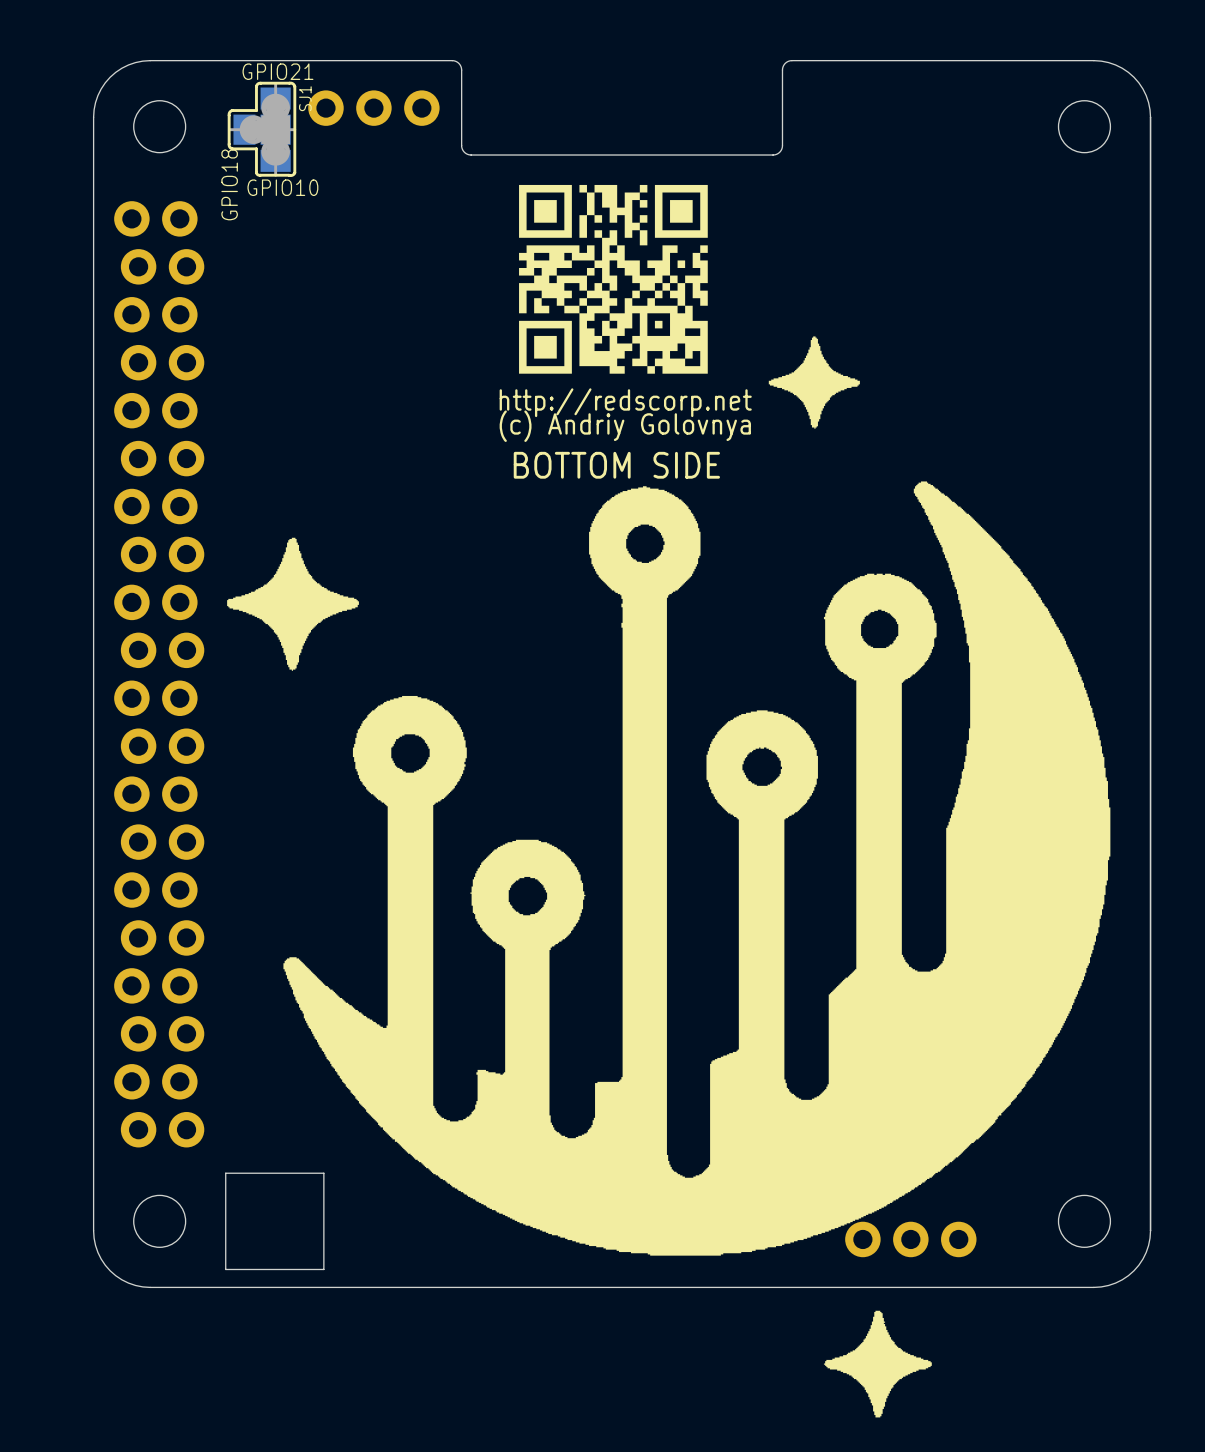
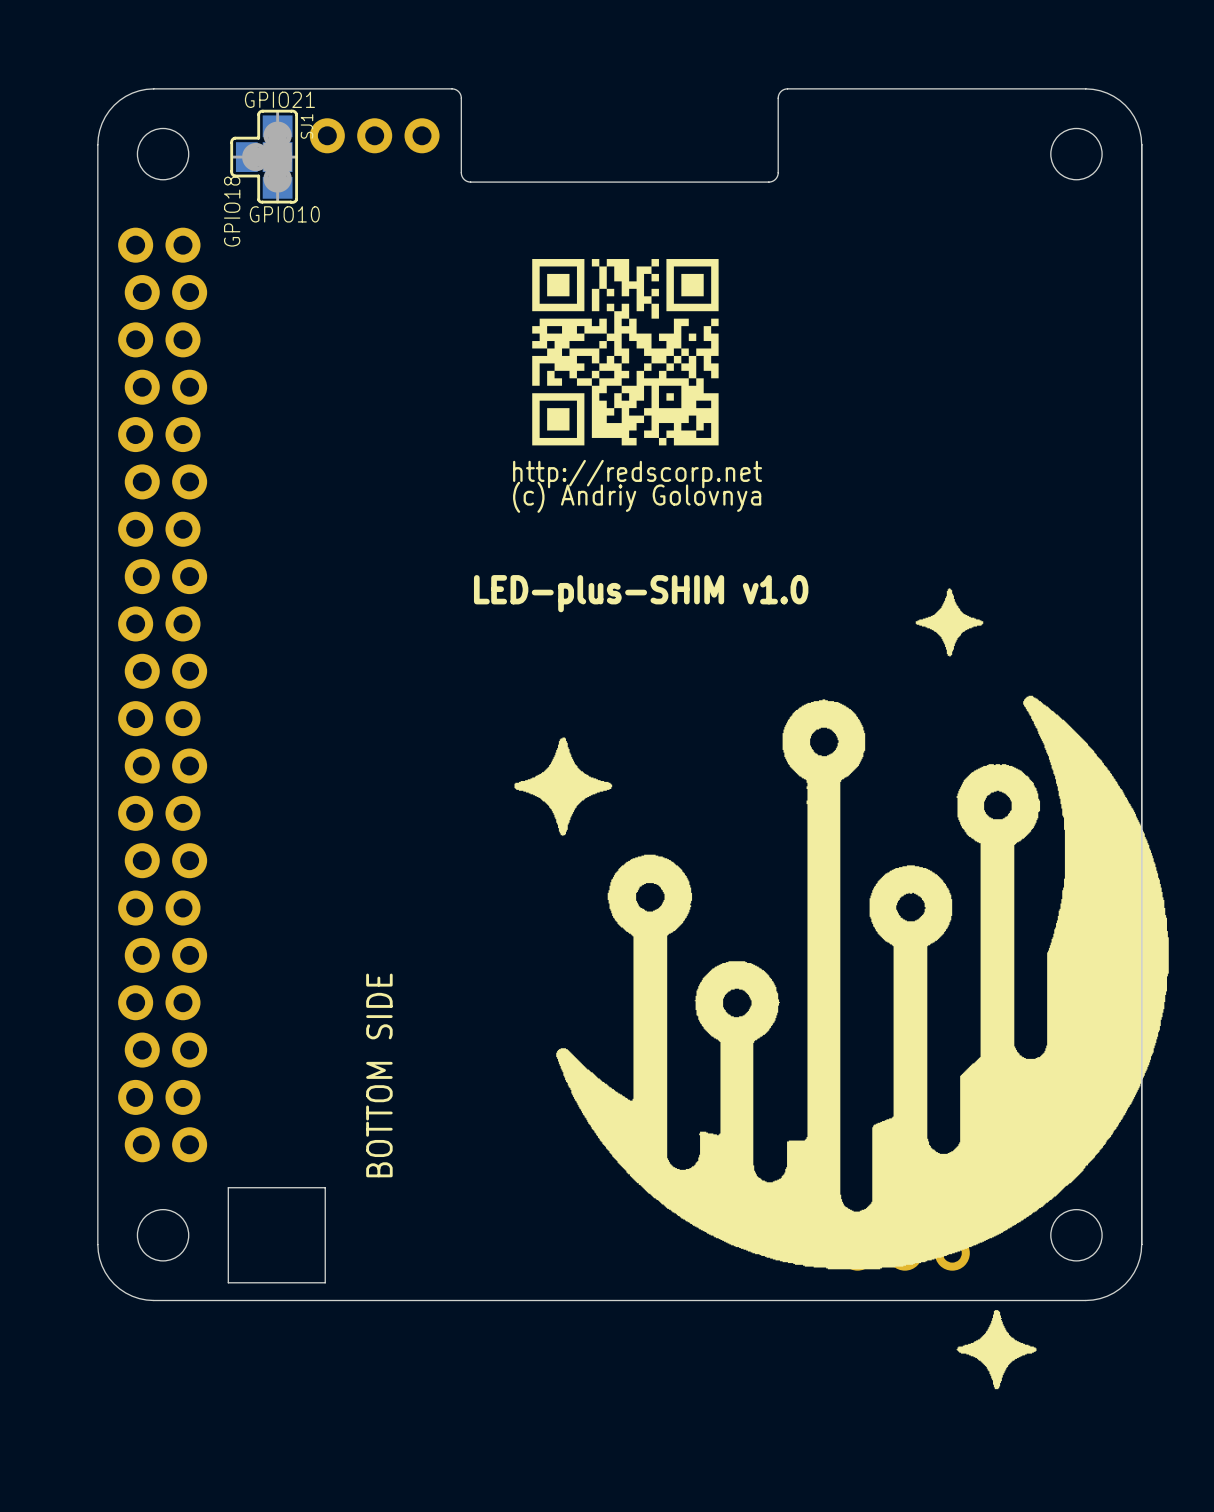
drawing position: (613, 279) -> (625, 352)
drawing: [227, 336, 1111, 1418] -> none
text position: http://redscorp.net (625, 402) -> http://redscorp.net (637, 474)
text: (c) Andriy Golovnya (625, 426) -> none
text: BOTTOM SIDE (616, 465) -> (c) Andriy Golovnya (637, 497)
drawing: none -> [514, 588, 1169, 1390]
text: none -> LED-plus-SHIM v1.0 (641, 593)
text: none -> BOTTOM SIDE (379, 1075)

